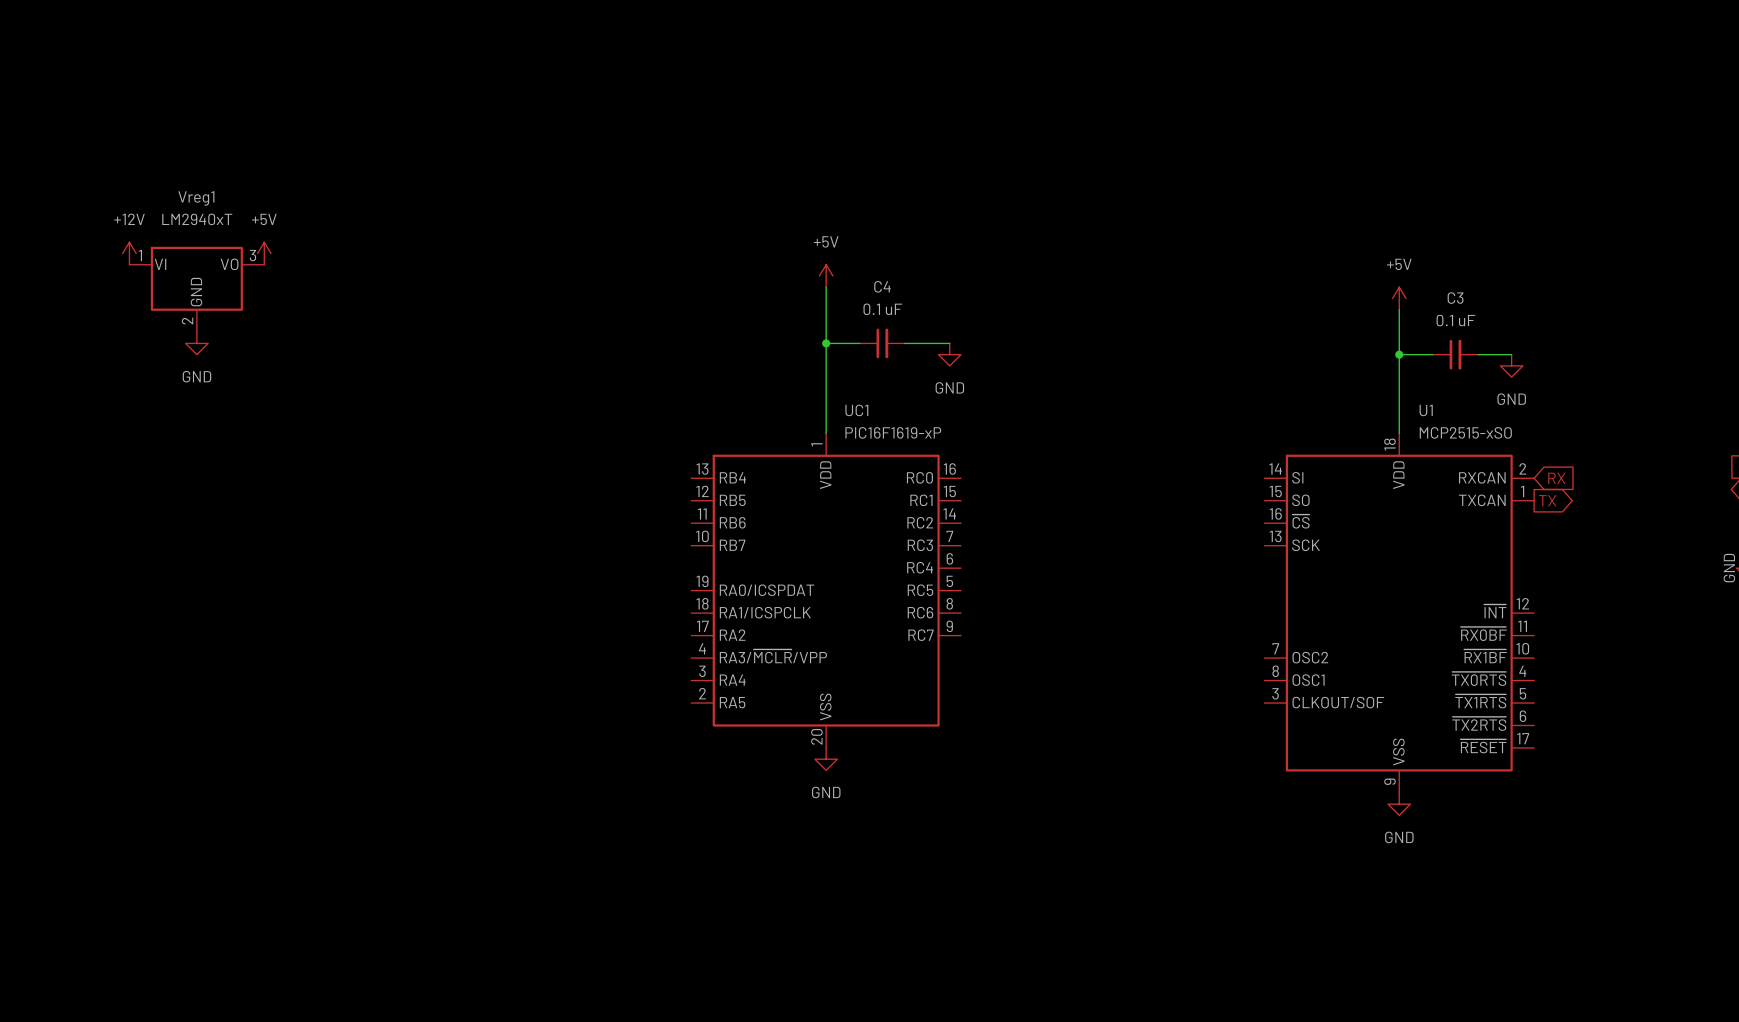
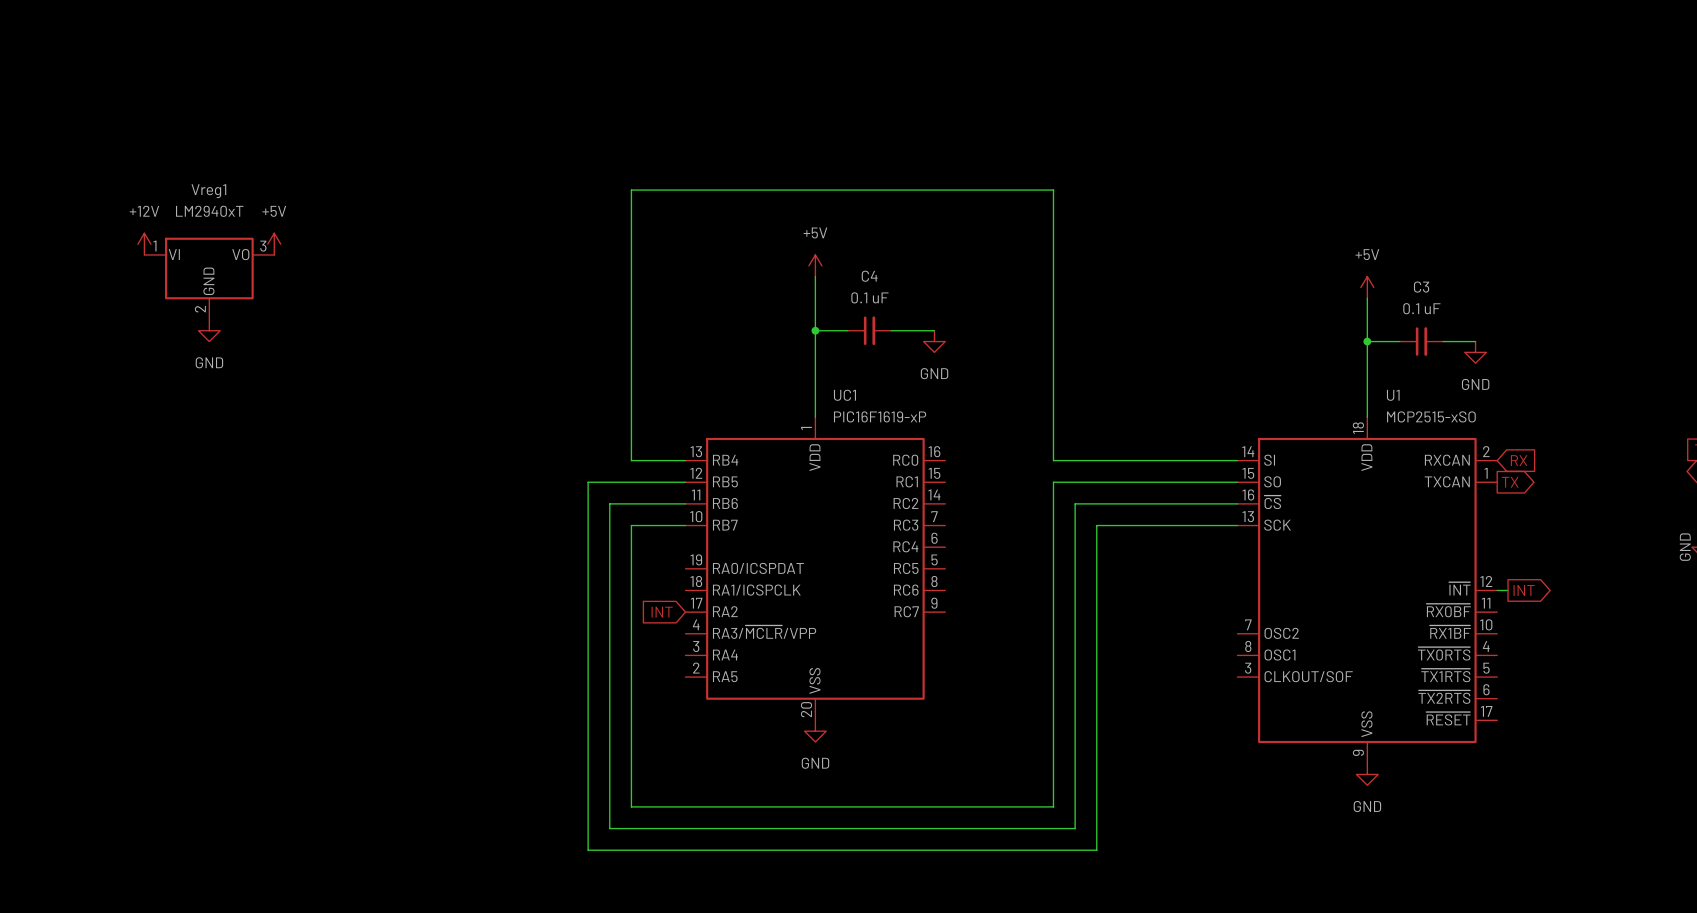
wire: none -> (685, 460) (631, 460) (631, 190) (1053, 190) (1053, 460) (1237, 460)
wire: none -> (685, 482) (588, 482) (588, 850) (1096, 850) (1096, 525) (1237, 525)
wire: none -> (1237, 482) (1053, 482) (1053, 806) (631, 806) (631, 525) (685, 525)
wire: none -> (685, 503) (609, 503) (609, 828) (1075, 828) (1075, 503) (1237, 503)
wire: none -> (1497, 590) (1508, 590)
global label: none -> INT (1524, 590)
global label: none -> INT (662, 612)

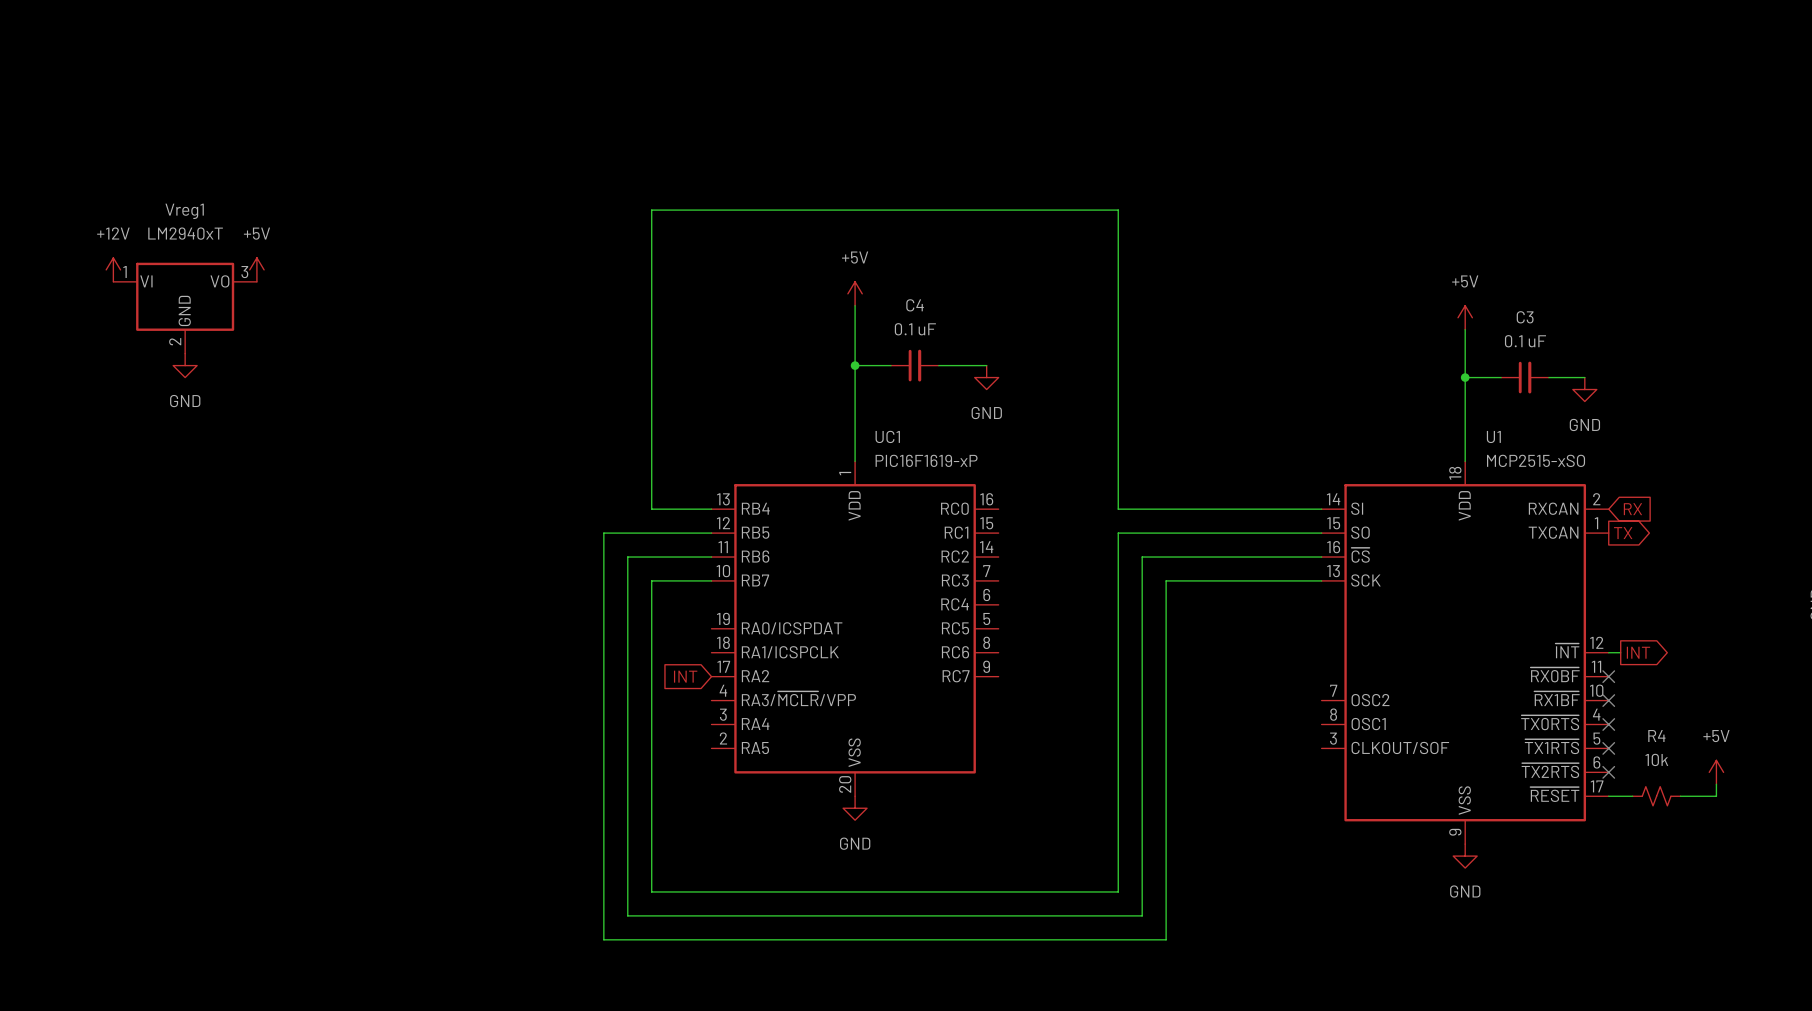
no-connect mark: none -> (1608, 676)
no-connect mark: none -> (1608, 700)
no-connect mark: none -> (1608, 724)
no-connect mark: none -> (1608, 748)
no-connect mark: none -> (1608, 772)
power symbol: none -> +5V (1716, 772)
wire: none -> (1716, 784) (1716, 796) (1680, 796)
wire: none -> (1608, 796) (1632, 796)
R4: none -> 10k (1656, 796)

